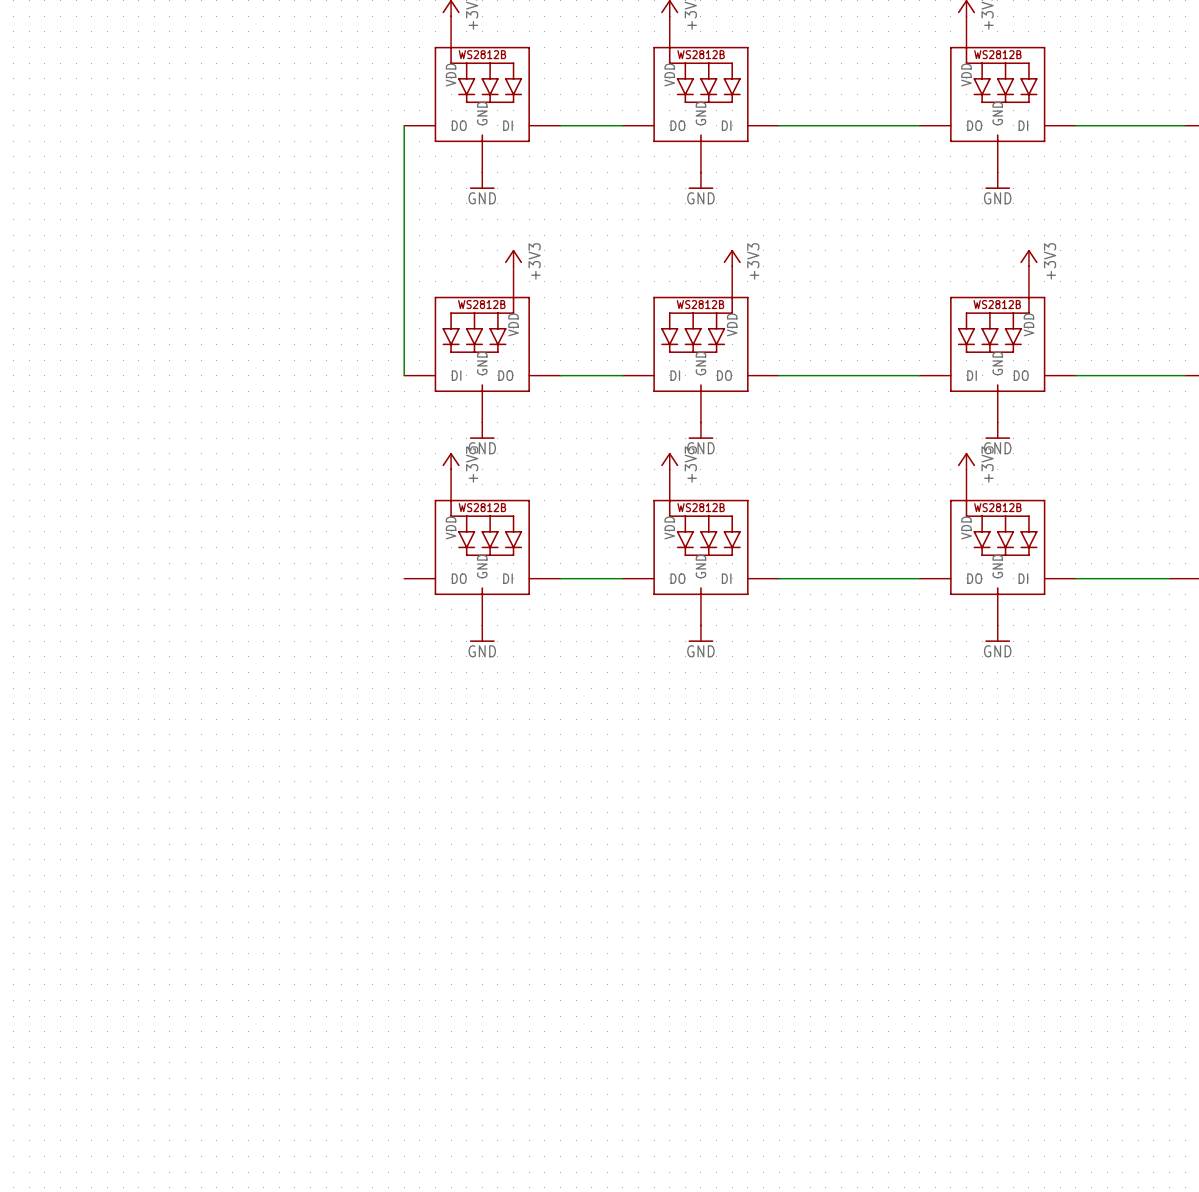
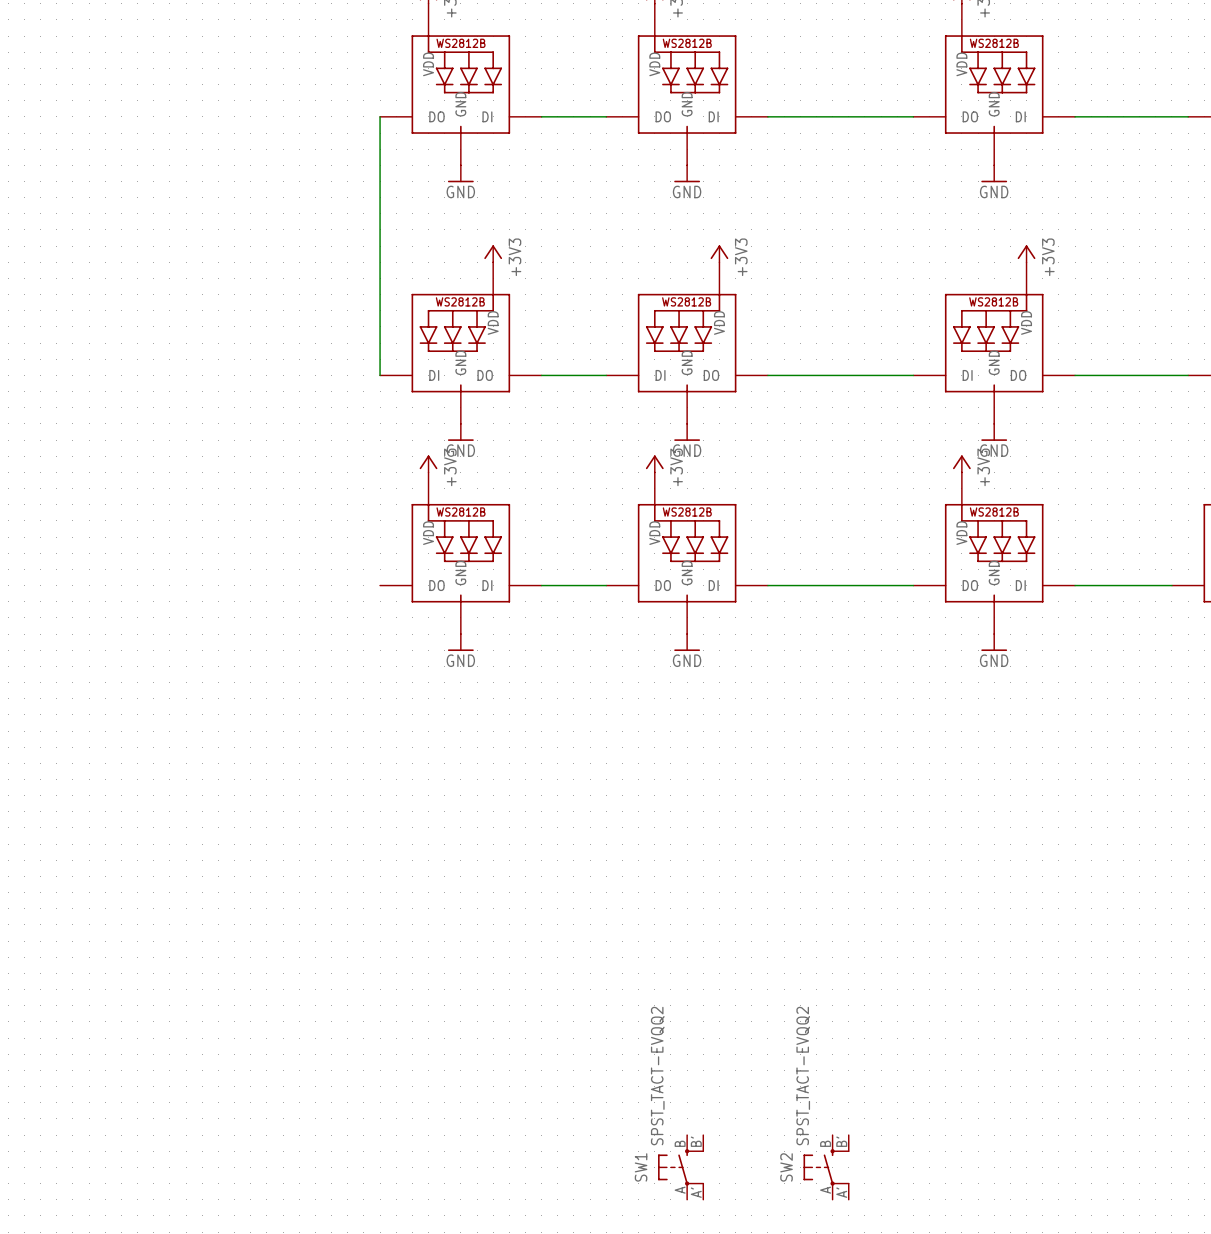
SW1: none -> SPST_TACT-EVQQ2 (680, 1167)
SW2: none -> SPST_TACT-EVQQ2 (826, 1167)

